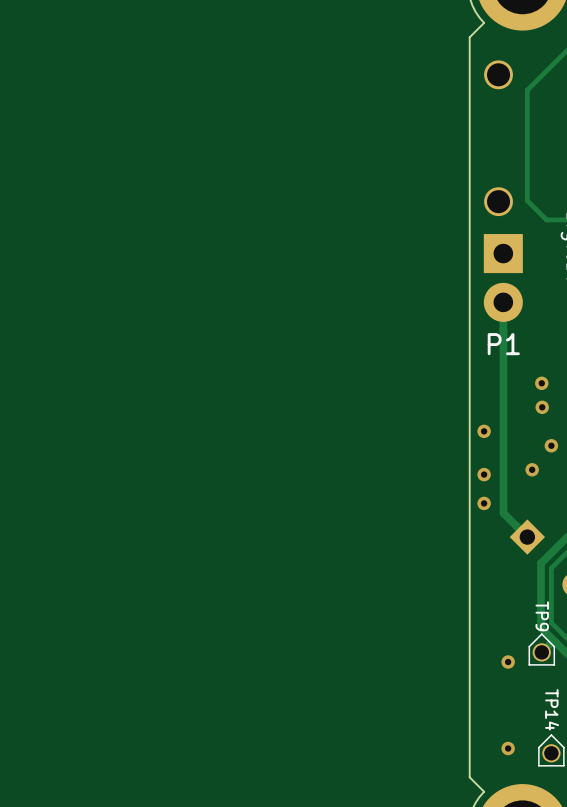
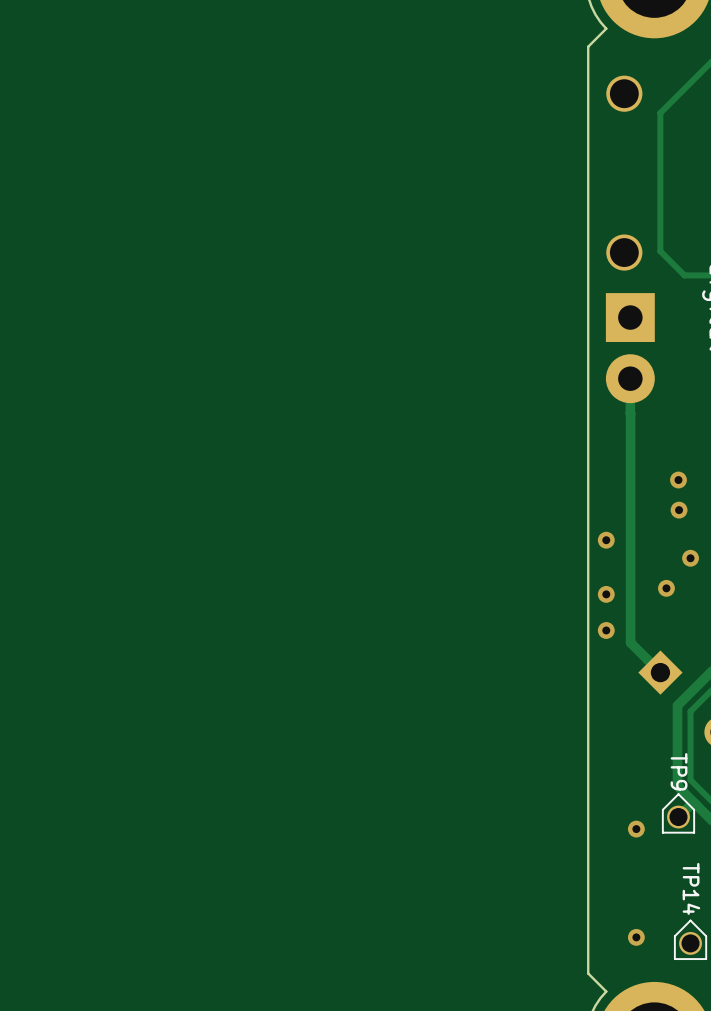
P1 name: P1 (503, 344) -> none

